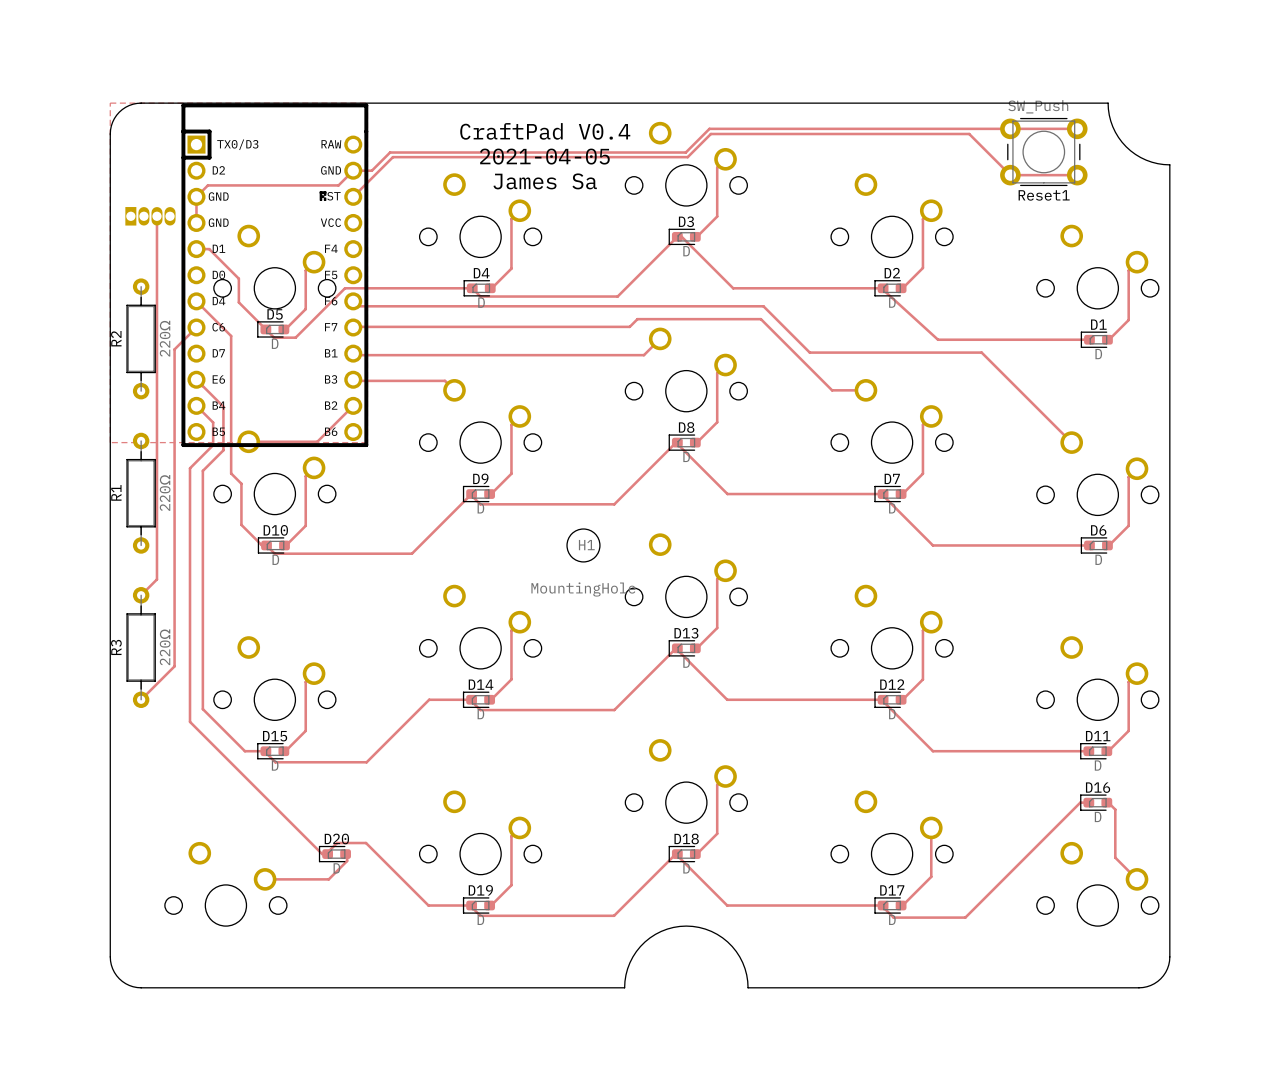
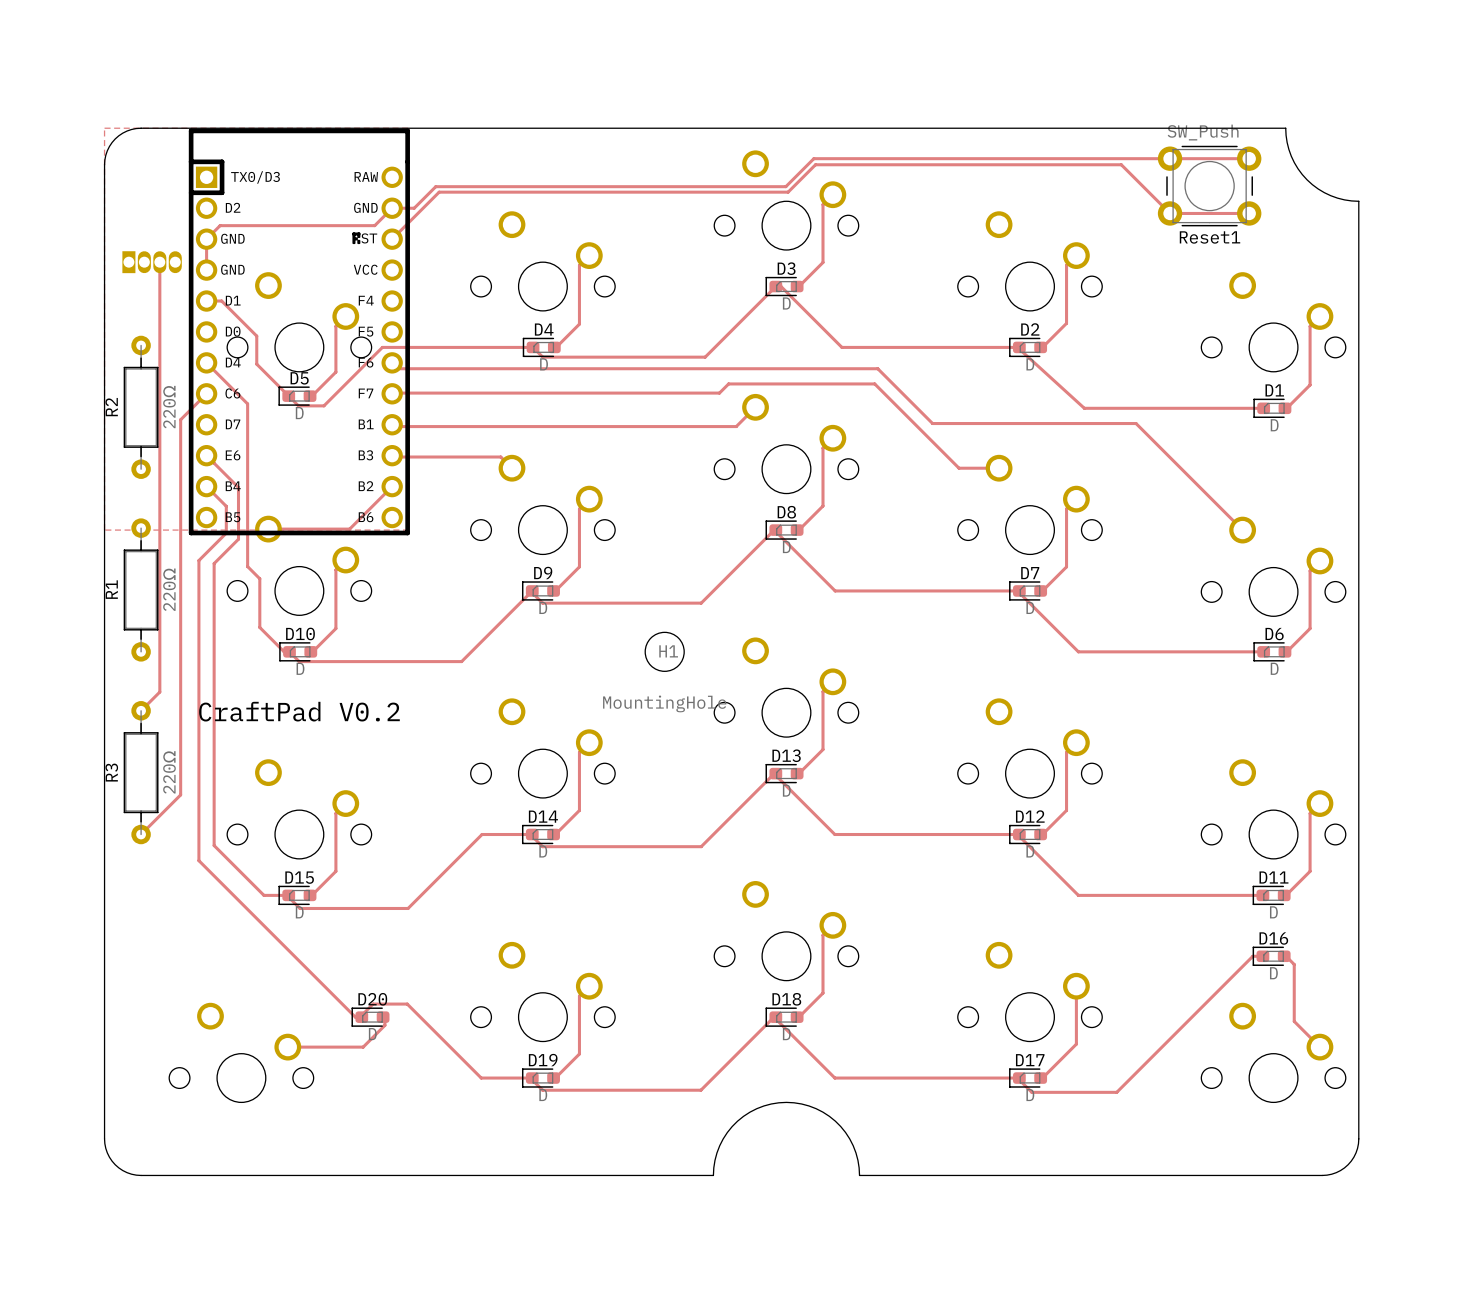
text: CraftPad V0.4 (545, 131) -> none
text: 2021-04-05 (544, 156) -> none
text: James Sa (545, 181) -> none
text: none -> CraftPad V0.2 (299, 711)

